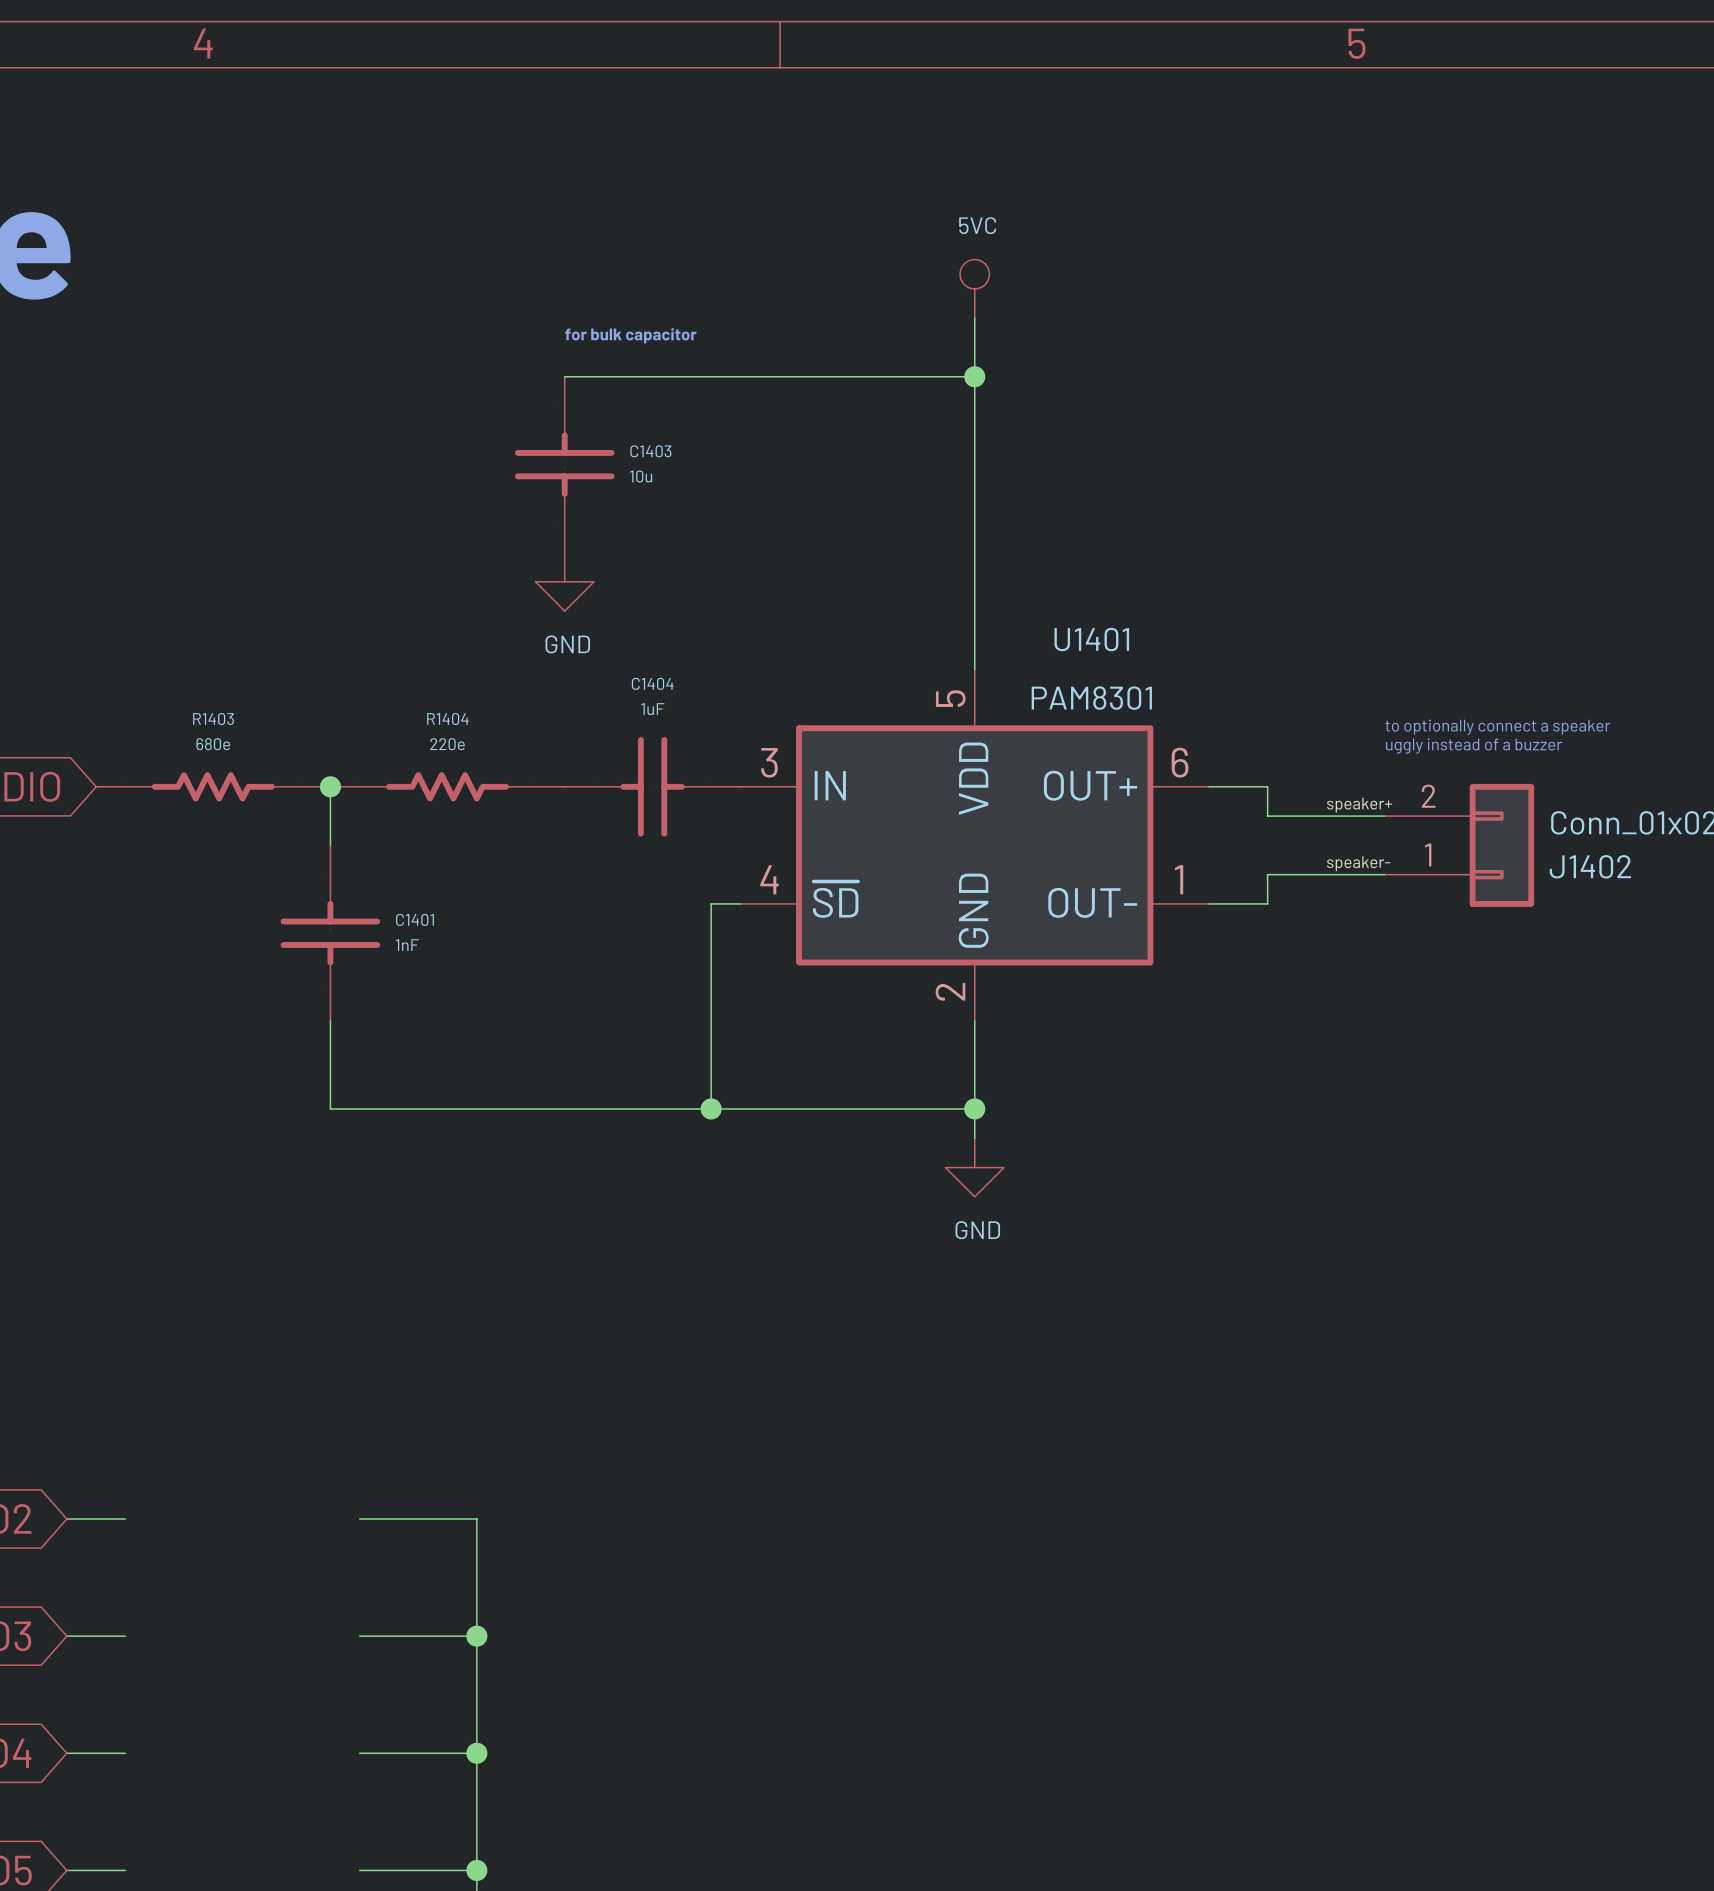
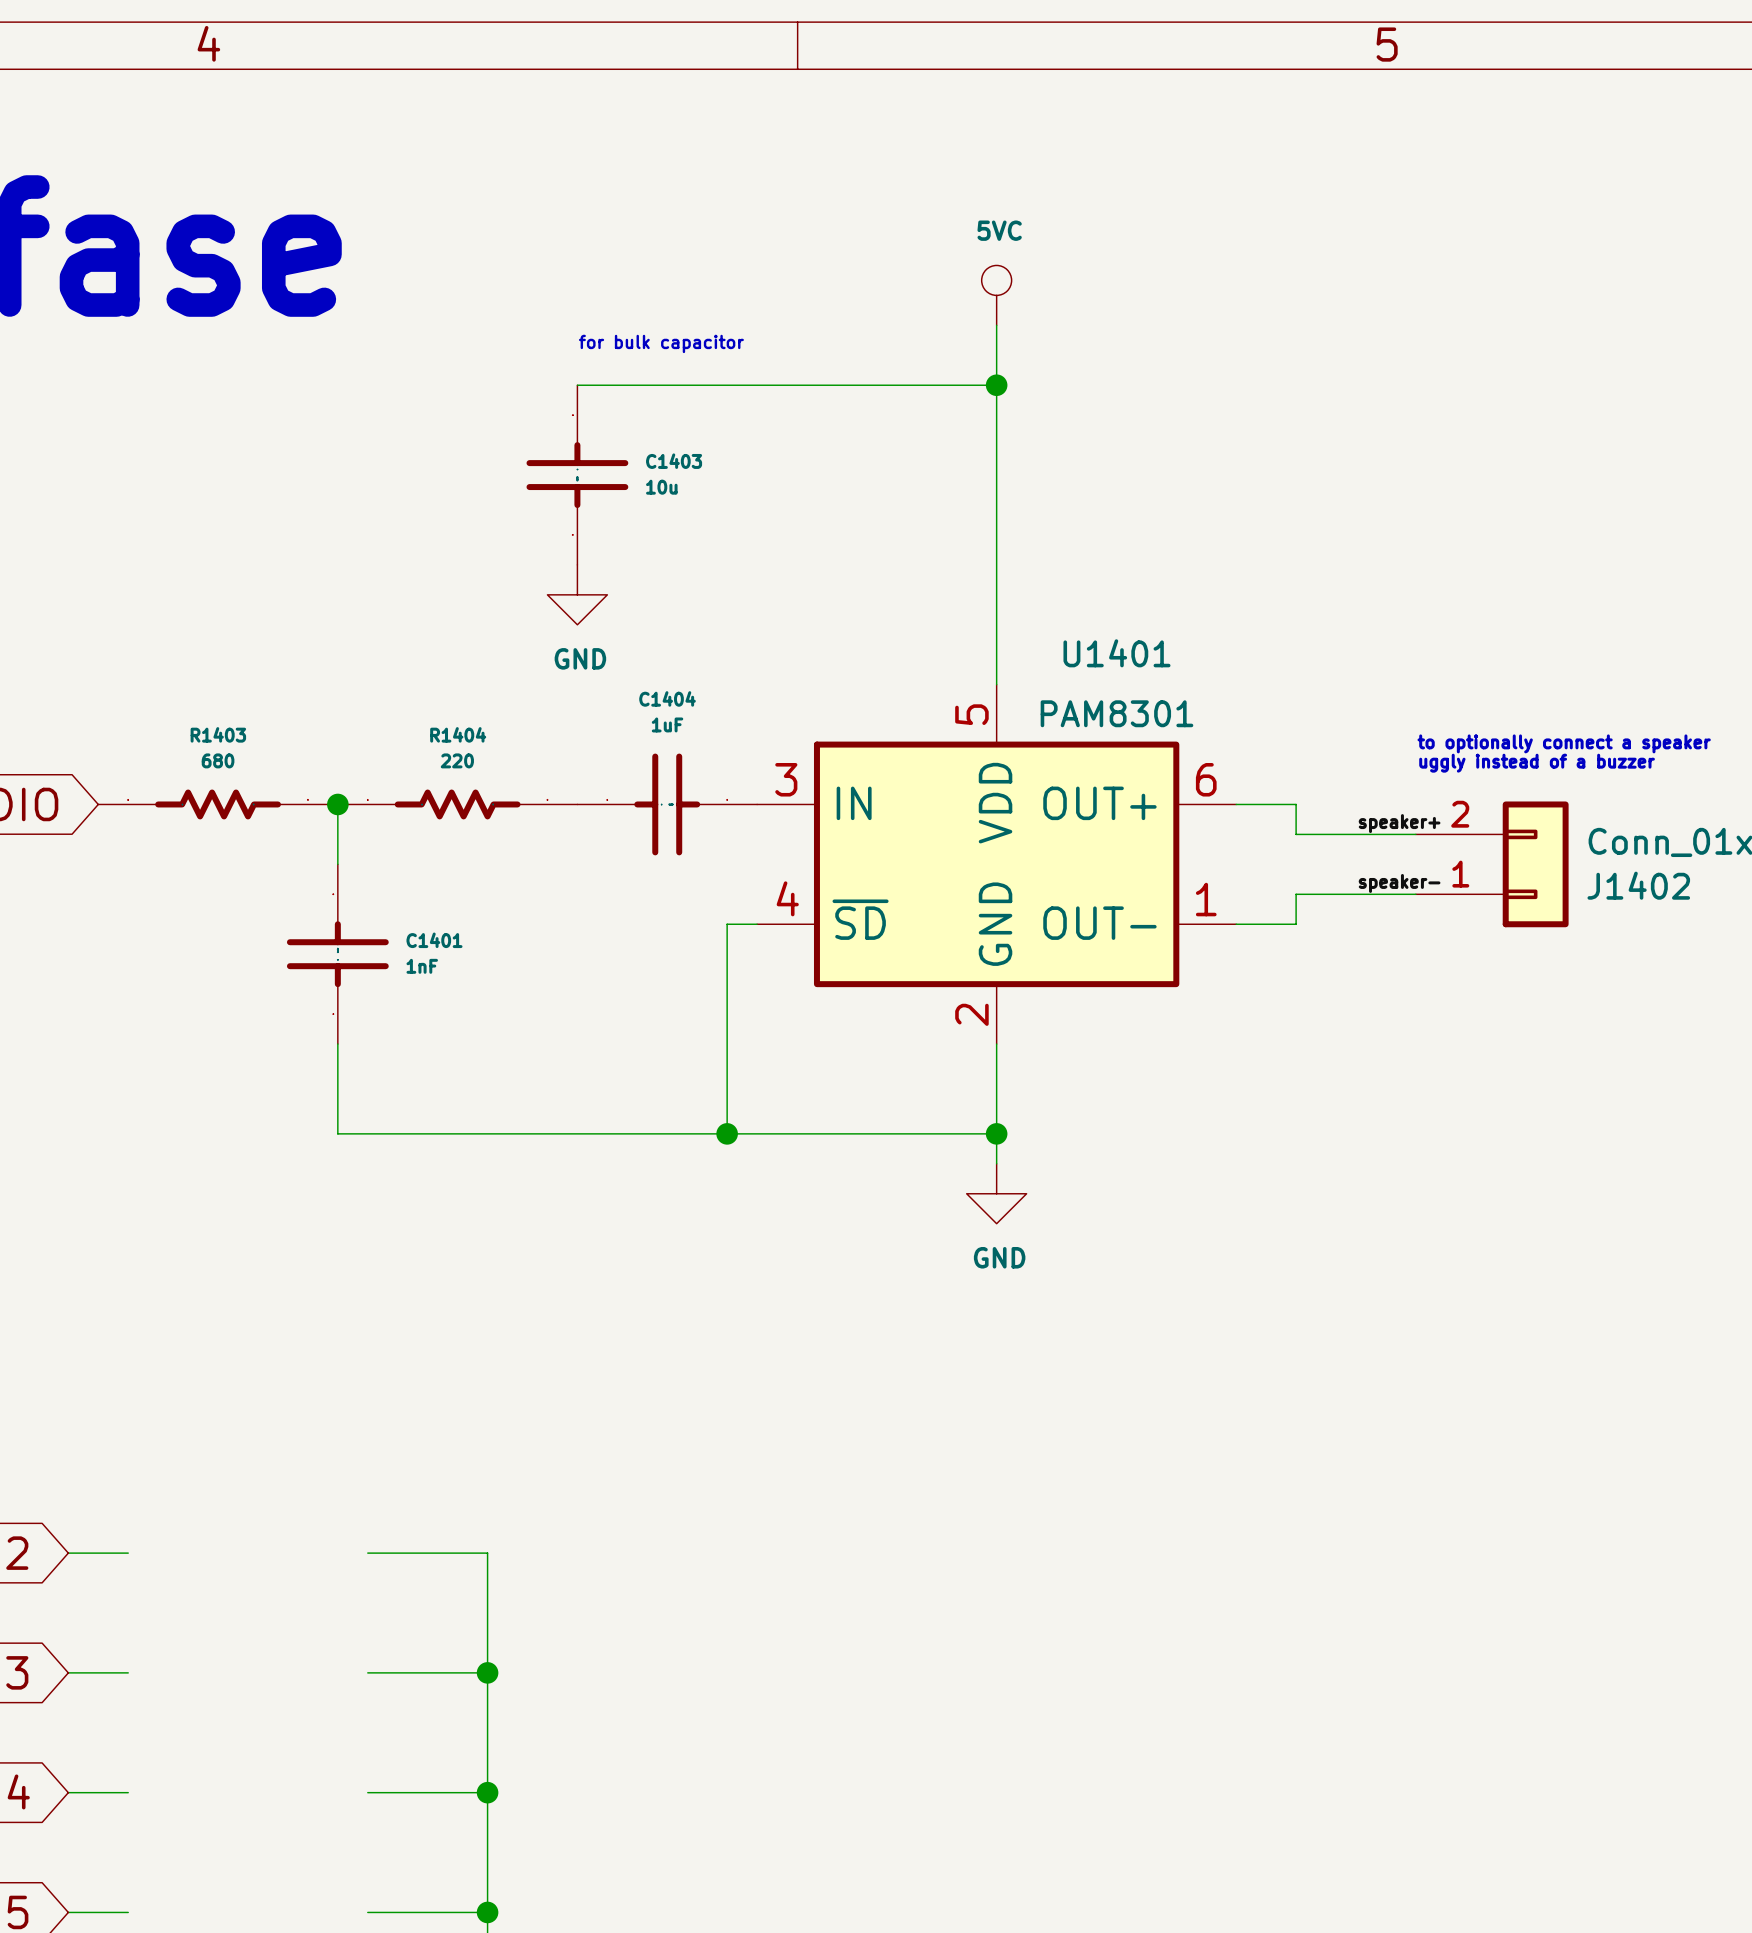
R1403 value: 680e (213, 744) -> 680 (218, 760)
R1404 value: 220e (447, 744) -> 220 (457, 760)

